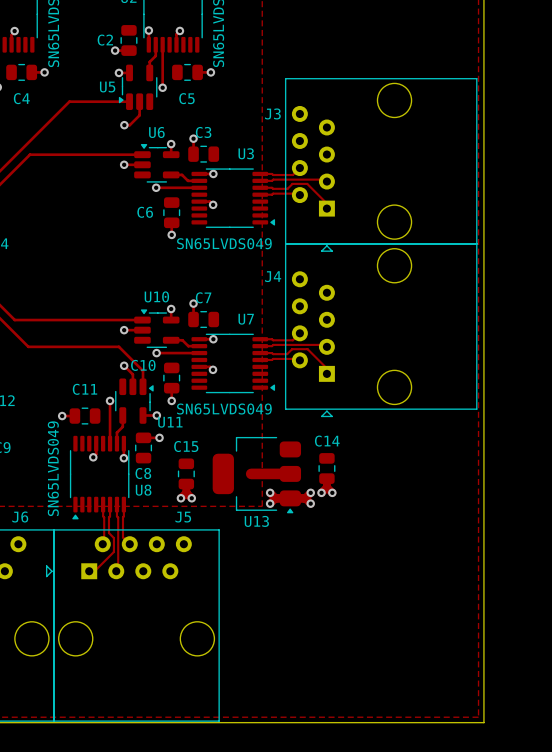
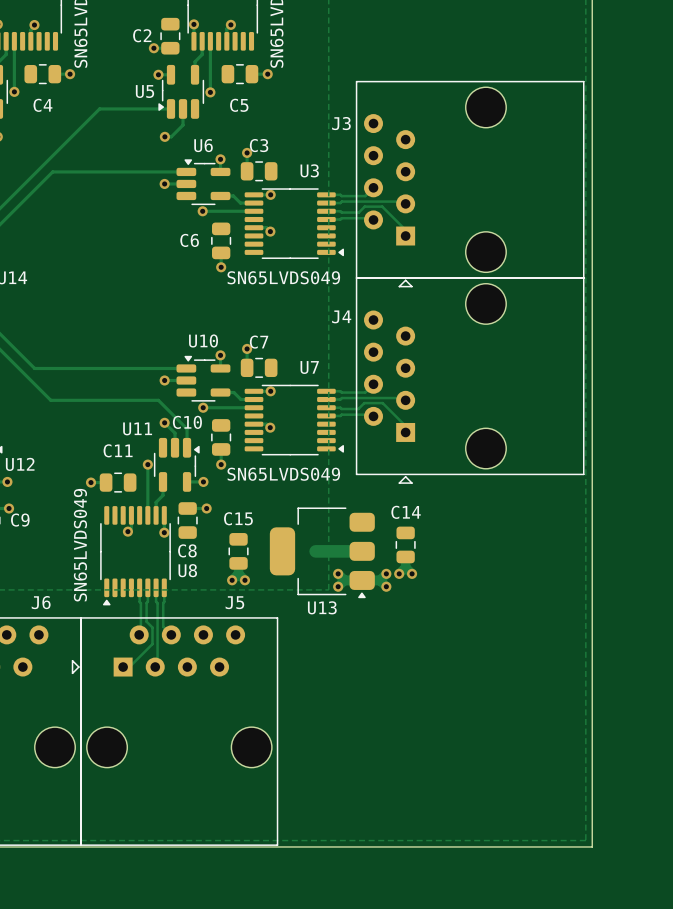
U11 name position: U11 (170, 422) -> U11 (137, 428)

